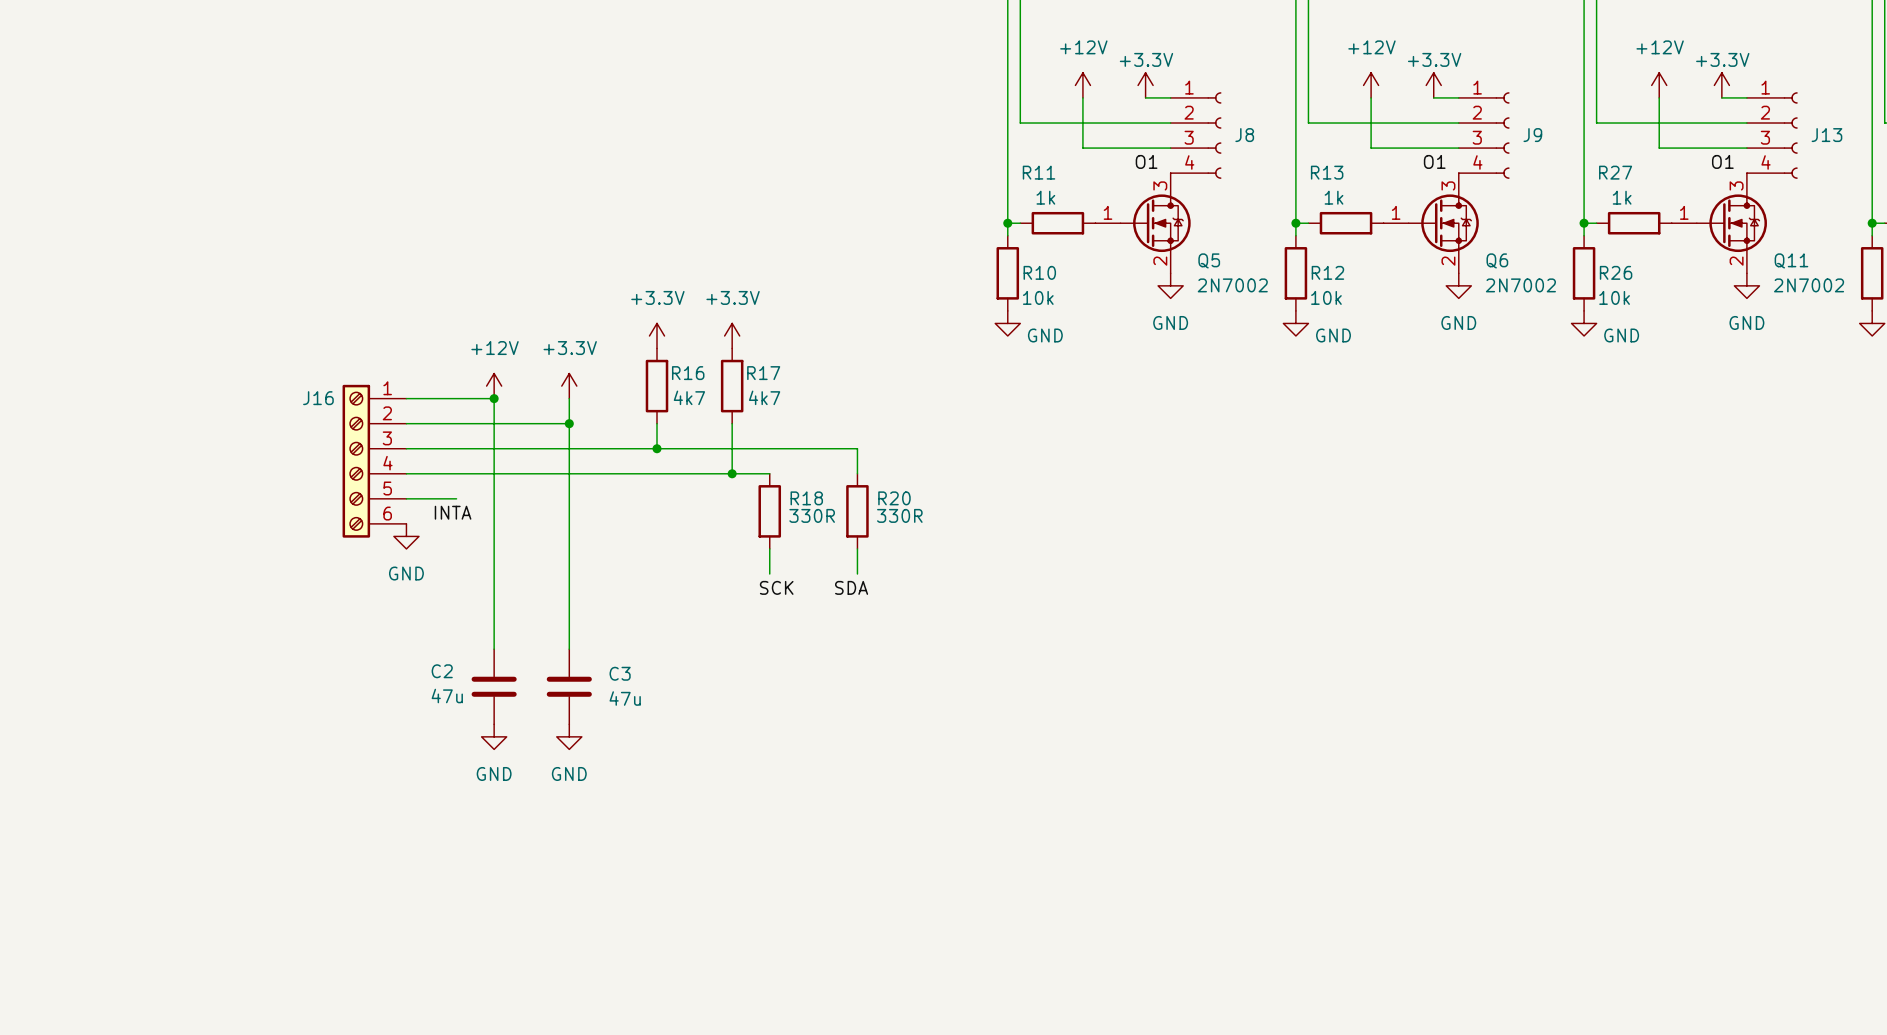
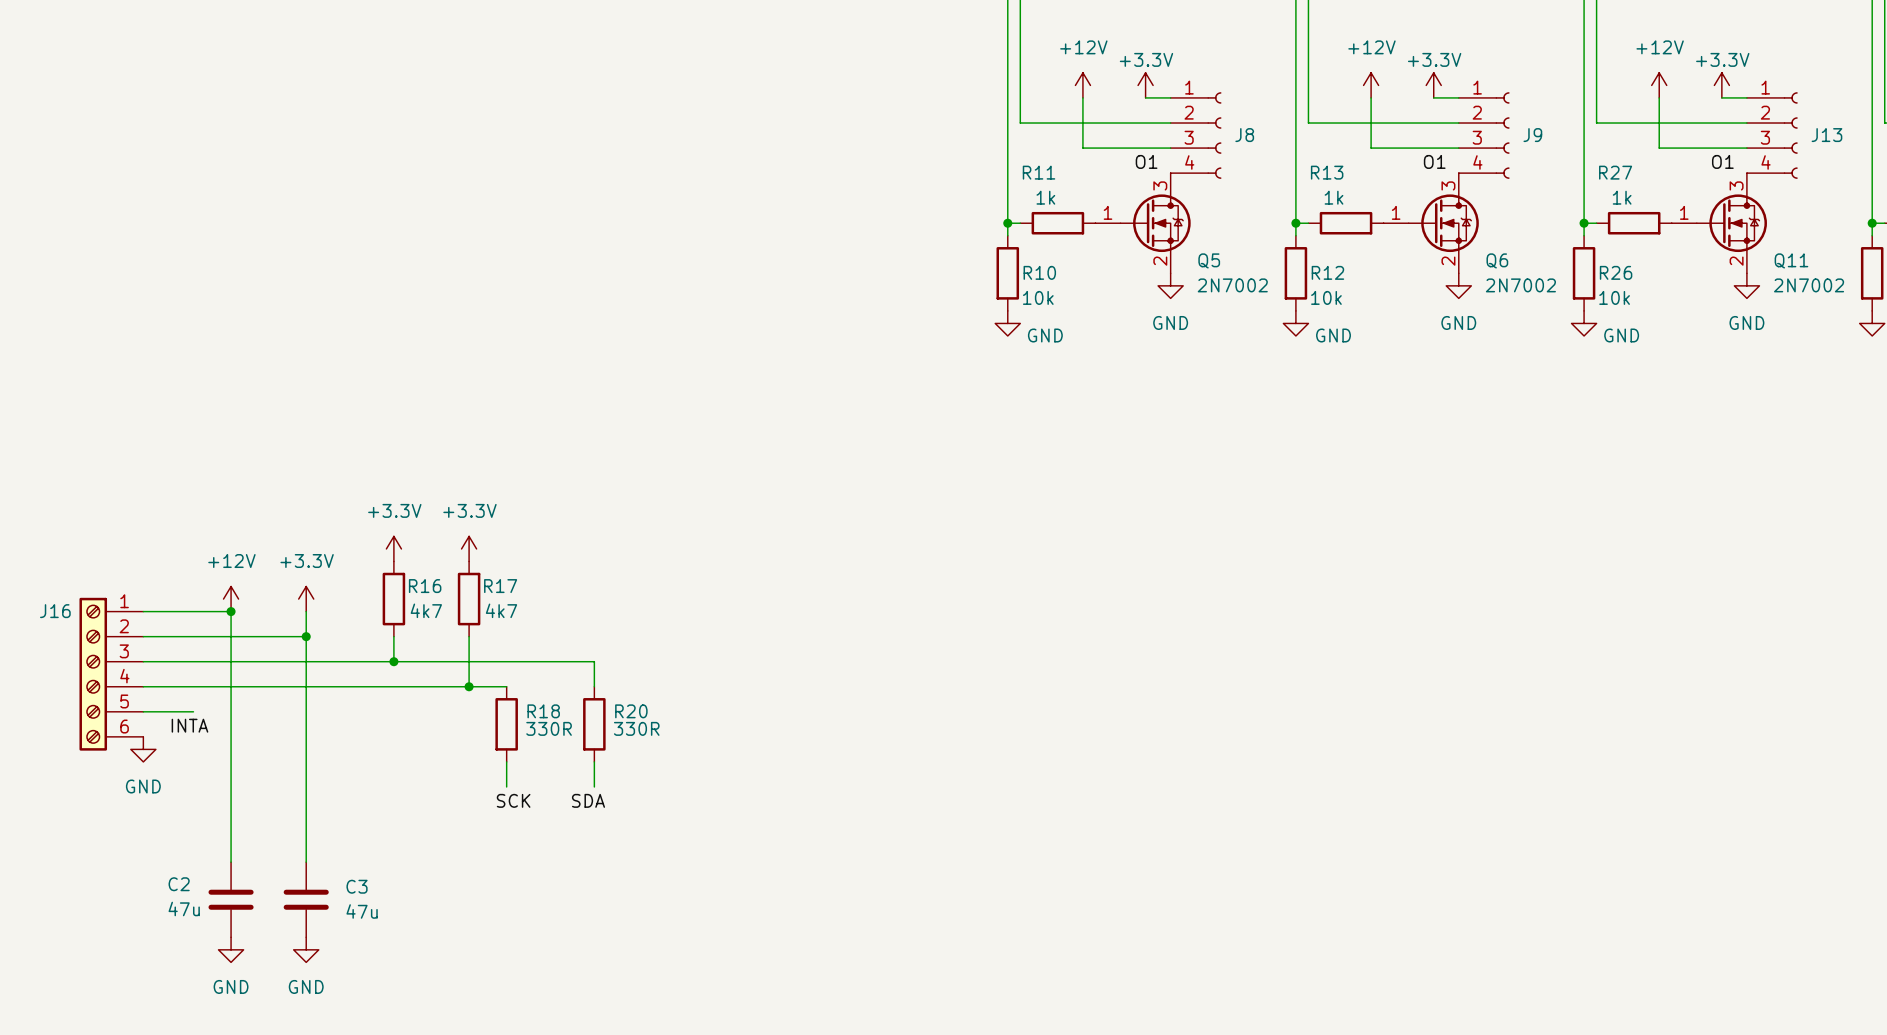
power symbol: +3.3V (657, 335) -> none
power symbol: +3.3V (732, 335) -> none
power symbol: +12V (494, 386) -> none
power symbol: +3.3V (569, 386) -> none
R16 position: (657, 386) -> (393, 599)
R17 position: (732, 386) -> (469, 599)
wire: (406, 398) (494, 398) (494, 649) -> none
junction: (494, 398) -> none
wire: (569, 398) (569, 649) -> none
wire: (406, 423) (569, 423) -> none
junction: (569, 423) -> none
wire: (657, 423) (657, 448) -> none
wire: (732, 423) (732, 473) -> none
wire: (406, 448) (857, 448) (857, 473) -> none
junction: (657, 448) -> none
J16 position: (374, 461) -> (111, 674)
wire: (406, 473) (769, 473) -> none
junction: (732, 473) -> none
wire: (406, 498) (456, 498) -> none
R18 position: (769, 511) -> (506, 724)
R20 position: (857, 511) -> (594, 724)
label: INTA (453, 512) -> none
power symbol: GND (406, 536) -> none
power symbol: none -> +3.3V (393, 548)
power symbol: none -> +3.3V (469, 548)
wire: (769, 548) (769, 574) -> none
wire: (857, 548) (857, 574) -> none
label: SCK (776, 587) -> none
label: SDA (851, 587) -> none
power symbol: none -> +12V (231, 599)
power symbol: none -> +3.3V (306, 599)
wire: none -> (143, 611) (231, 611) (231, 862)
junction: none -> (231, 611)
wire: none -> (306, 611) (306, 862)
wire: none -> (143, 636) (306, 636)
junction: none -> (306, 636)
wire: none -> (393, 636) (393, 661)
wire: none -> (469, 636) (469, 686)
wire: none -> (143, 661) (594, 661) (594, 686)
junction: none -> (393, 661)
wire: none -> (143, 686) (506, 686)
junction: none -> (469, 686)
C2 position: (494, 686) -> (231, 899)
C3 position: (569, 686) -> (306, 899)
wire: none -> (143, 711) (193, 711)
label: none -> INTA (189, 725)
power symbol: GND (494, 736) -> none
power symbol: GND (569, 736) -> none
power symbol: none -> GND (143, 749)
wire: none -> (506, 761) (506, 786)
wire: none -> (594, 761) (594, 786)
label: none -> SCK (513, 800)
label: none -> SDA (588, 800)
power symbol: none -> GND (231, 949)
power symbol: none -> GND (306, 949)

